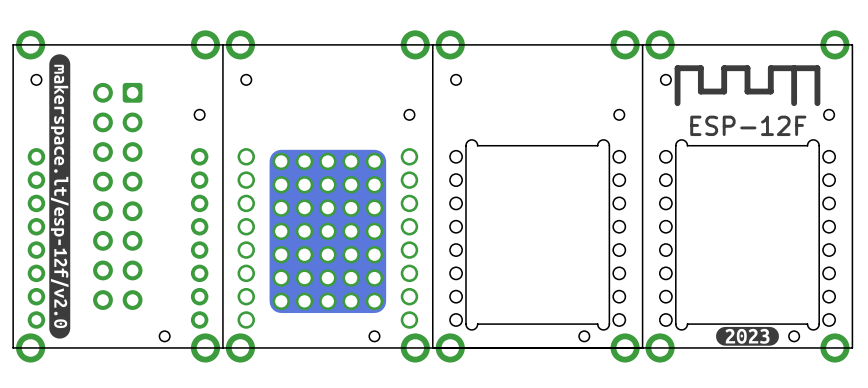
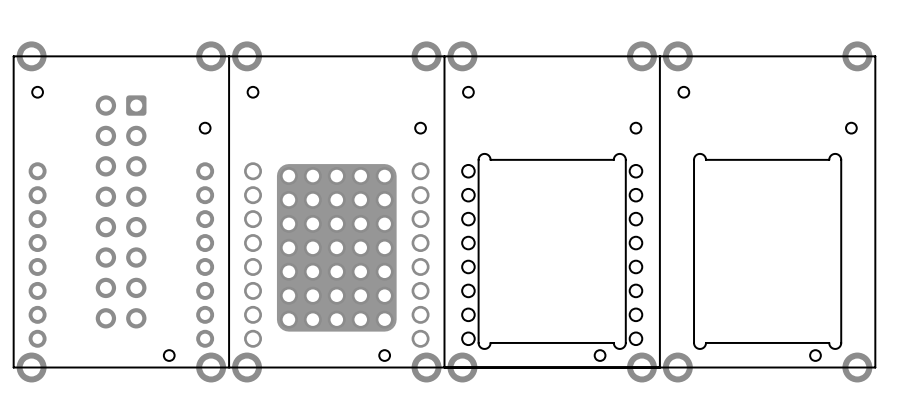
drawing: [49, 54, 71, 339] -> none
part: (747, 195) -> none
drawing: [716, 326, 779, 346] -> none

